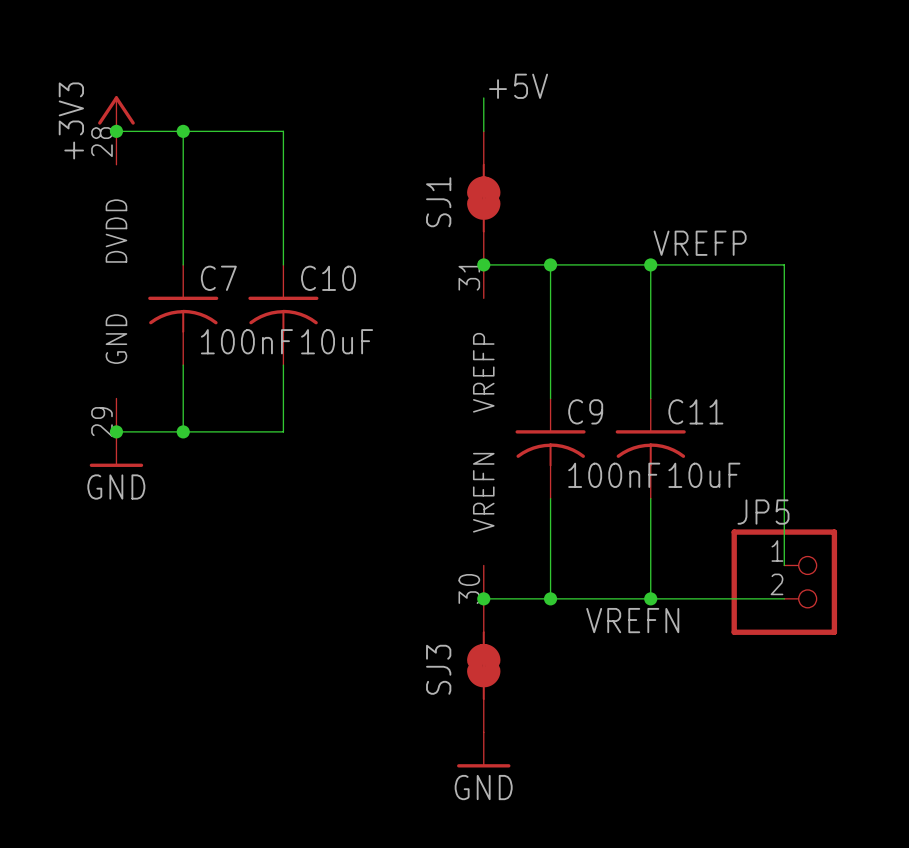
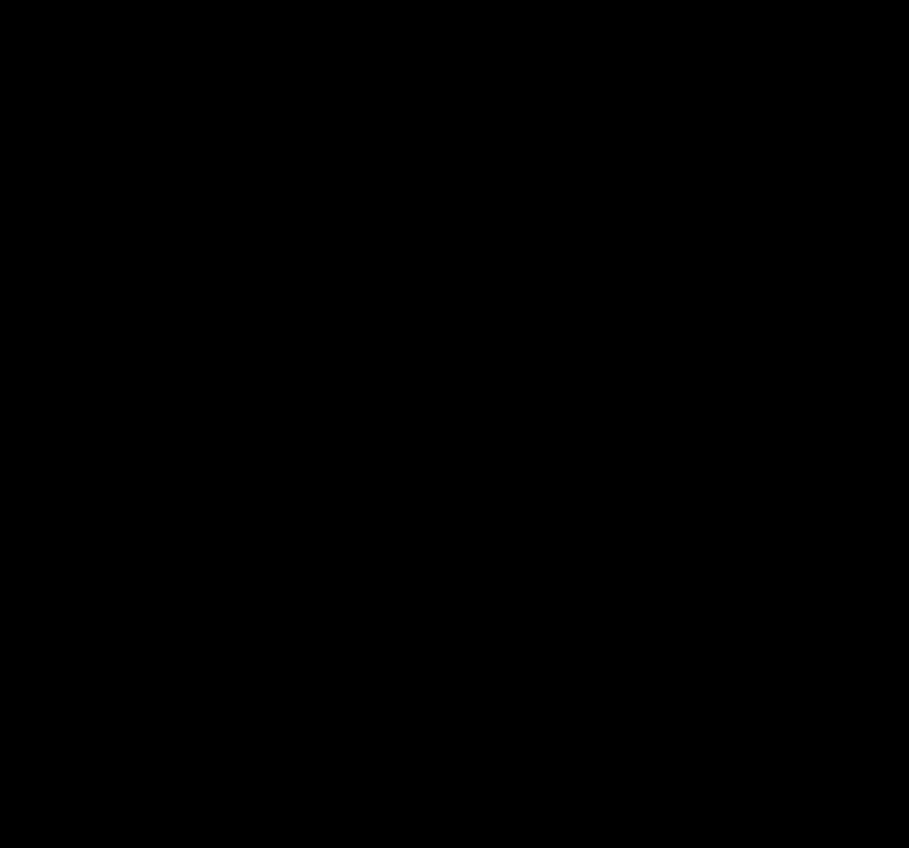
label: +5V (518, 86) -> none
wire: (483, 97) (483, 131) -> none
power symbol: +3V3 (116, 113) -> none
wire: (116, 131) (283, 131) (283, 264) -> none
junction: (116, 131) -> none
wire: (183, 131) (183, 264) -> none
junction: (183, 131) -> none
SJ1: (483, 198) -> none
label: VREFP (700, 243) -> none
wire: (483, 264) (784, 264) (784, 565) -> none
junction: (483, 264) -> none
wire: (550, 264) (550, 398) -> none
junction: (550, 264) -> none
wire: (650, 264) (650, 398) -> none
junction: (650, 264) -> none
part: (116, 281) -> none
C7: 100nF (183, 315) -> none
C10: 10uF (283, 315) -> none
wire: (183, 365) (183, 431) -> none
wire: (283, 365) (283, 431) (116, 431) -> none
junction: (116, 431) -> none
junction: (183, 431) -> none
part: (483, 431) -> none
C9: 100nF (550, 448) -> none
C11: 10uF (650, 448) -> none
power symbol: GND (116, 449) -> none
wire: (550, 498) (550, 598) -> none
wire: (650, 498) (650, 598) -> none
JP5: (784, 582) -> none
wire: (483, 598) (784, 598) -> none
junction: (483, 598) -> none
junction: (550, 598) -> none
junction: (650, 598) -> none
label: VREFN (632, 620) -> none
SJ3: (483, 665) -> none
power symbol: GND (483, 749) -> none

